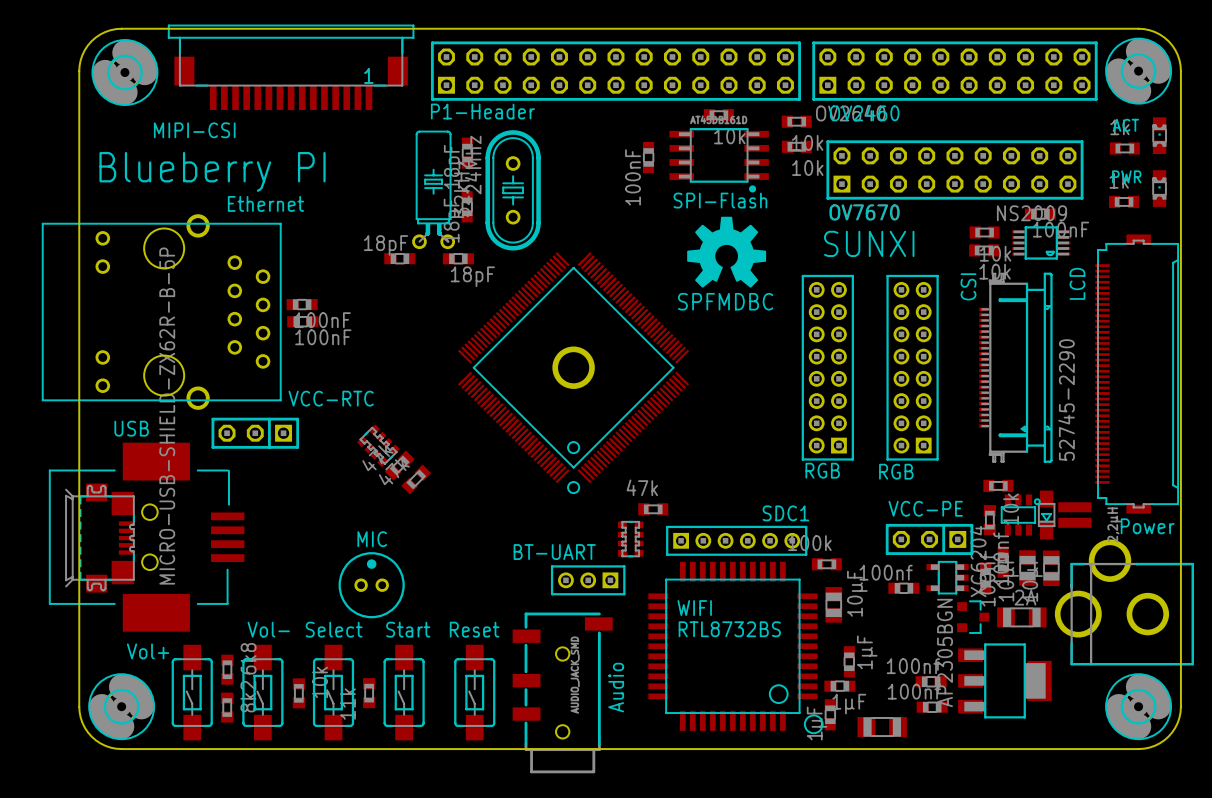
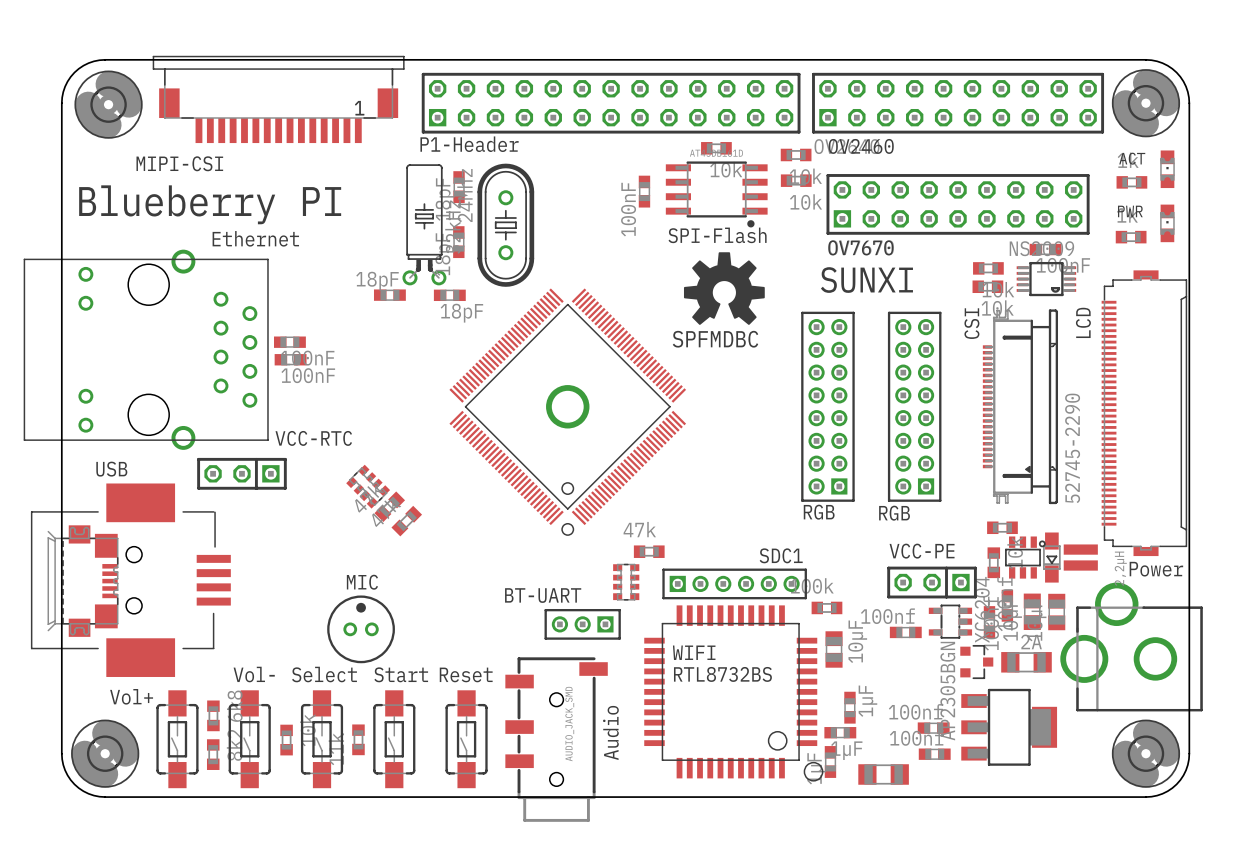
part value: MICRO-USB-SHIELD-ZX62R-B-5P (167, 416) -> none

